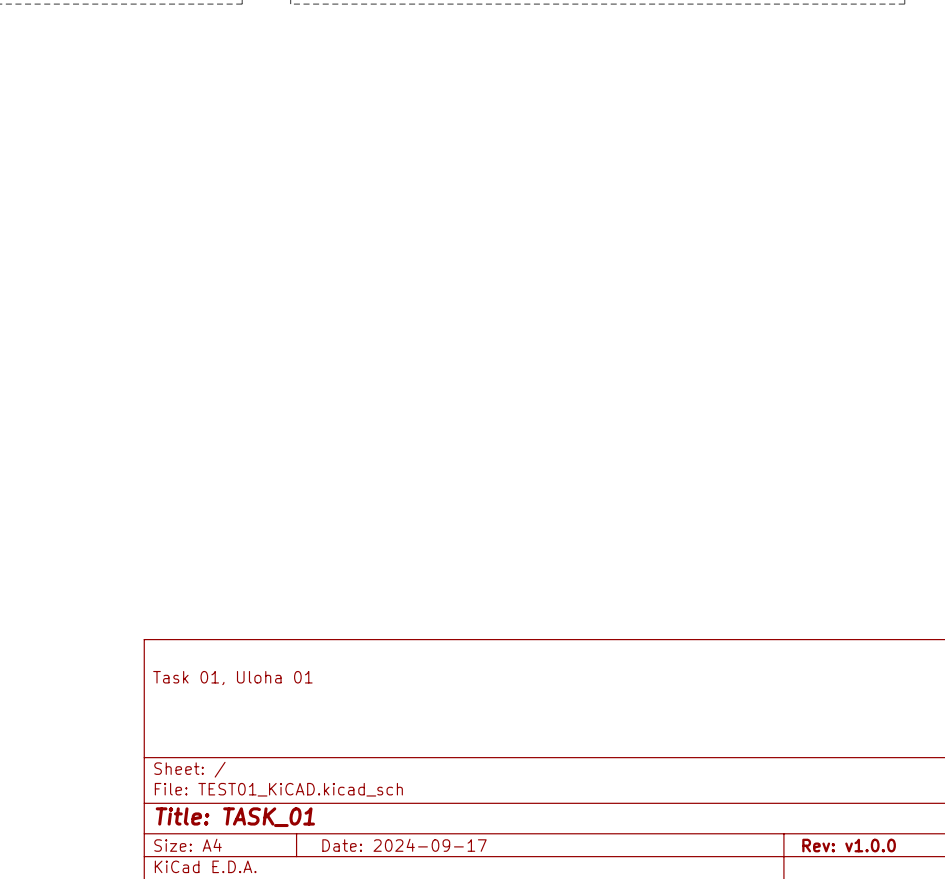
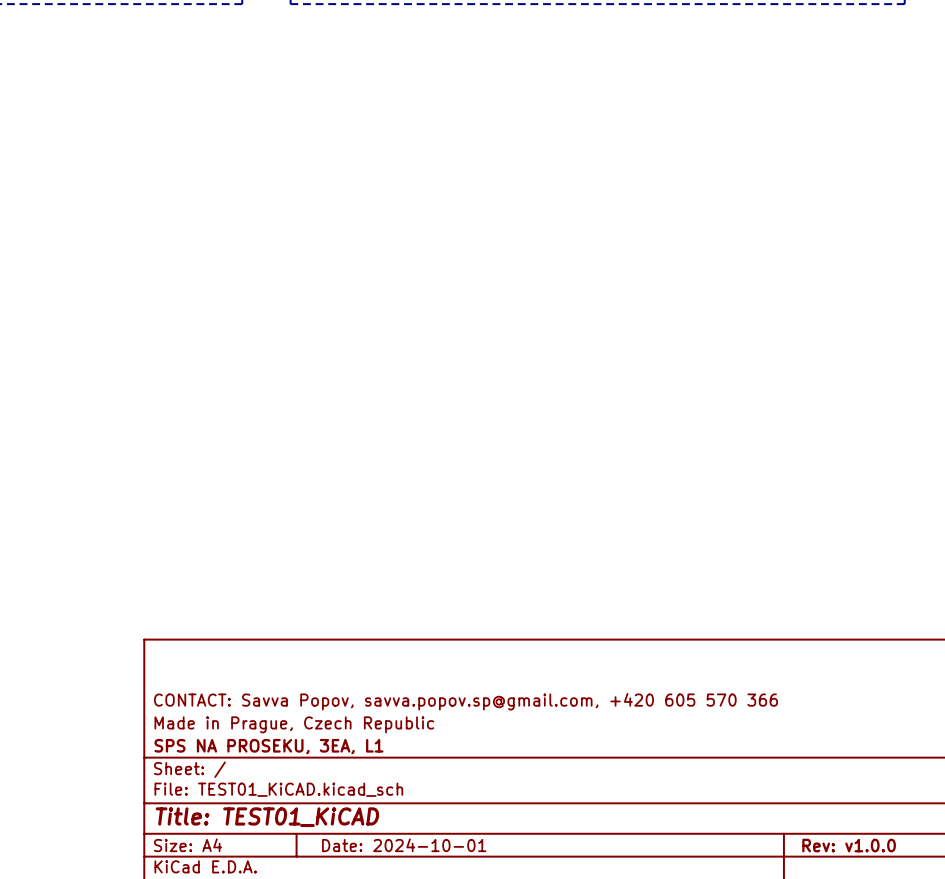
title block: Task 01, Uloha 01 (232, 678) -> none
title block: none -> CONTACT: Savva Popov, savva.popov.sp@gmail.com, +420 605 570 366 (465, 701)
title block: none -> Made in Prague, Czech Republic (294, 724)
title block: none -> SPS NA PROSEKU, 3EA, L1 (268, 746)
title block: Title: TASK_01 (235, 817) -> Title: TEST01_KiCAD (267, 817)
title block: Date: 2024-09-17 (404, 845) -> Date: 2024-10-01 (404, 845)

